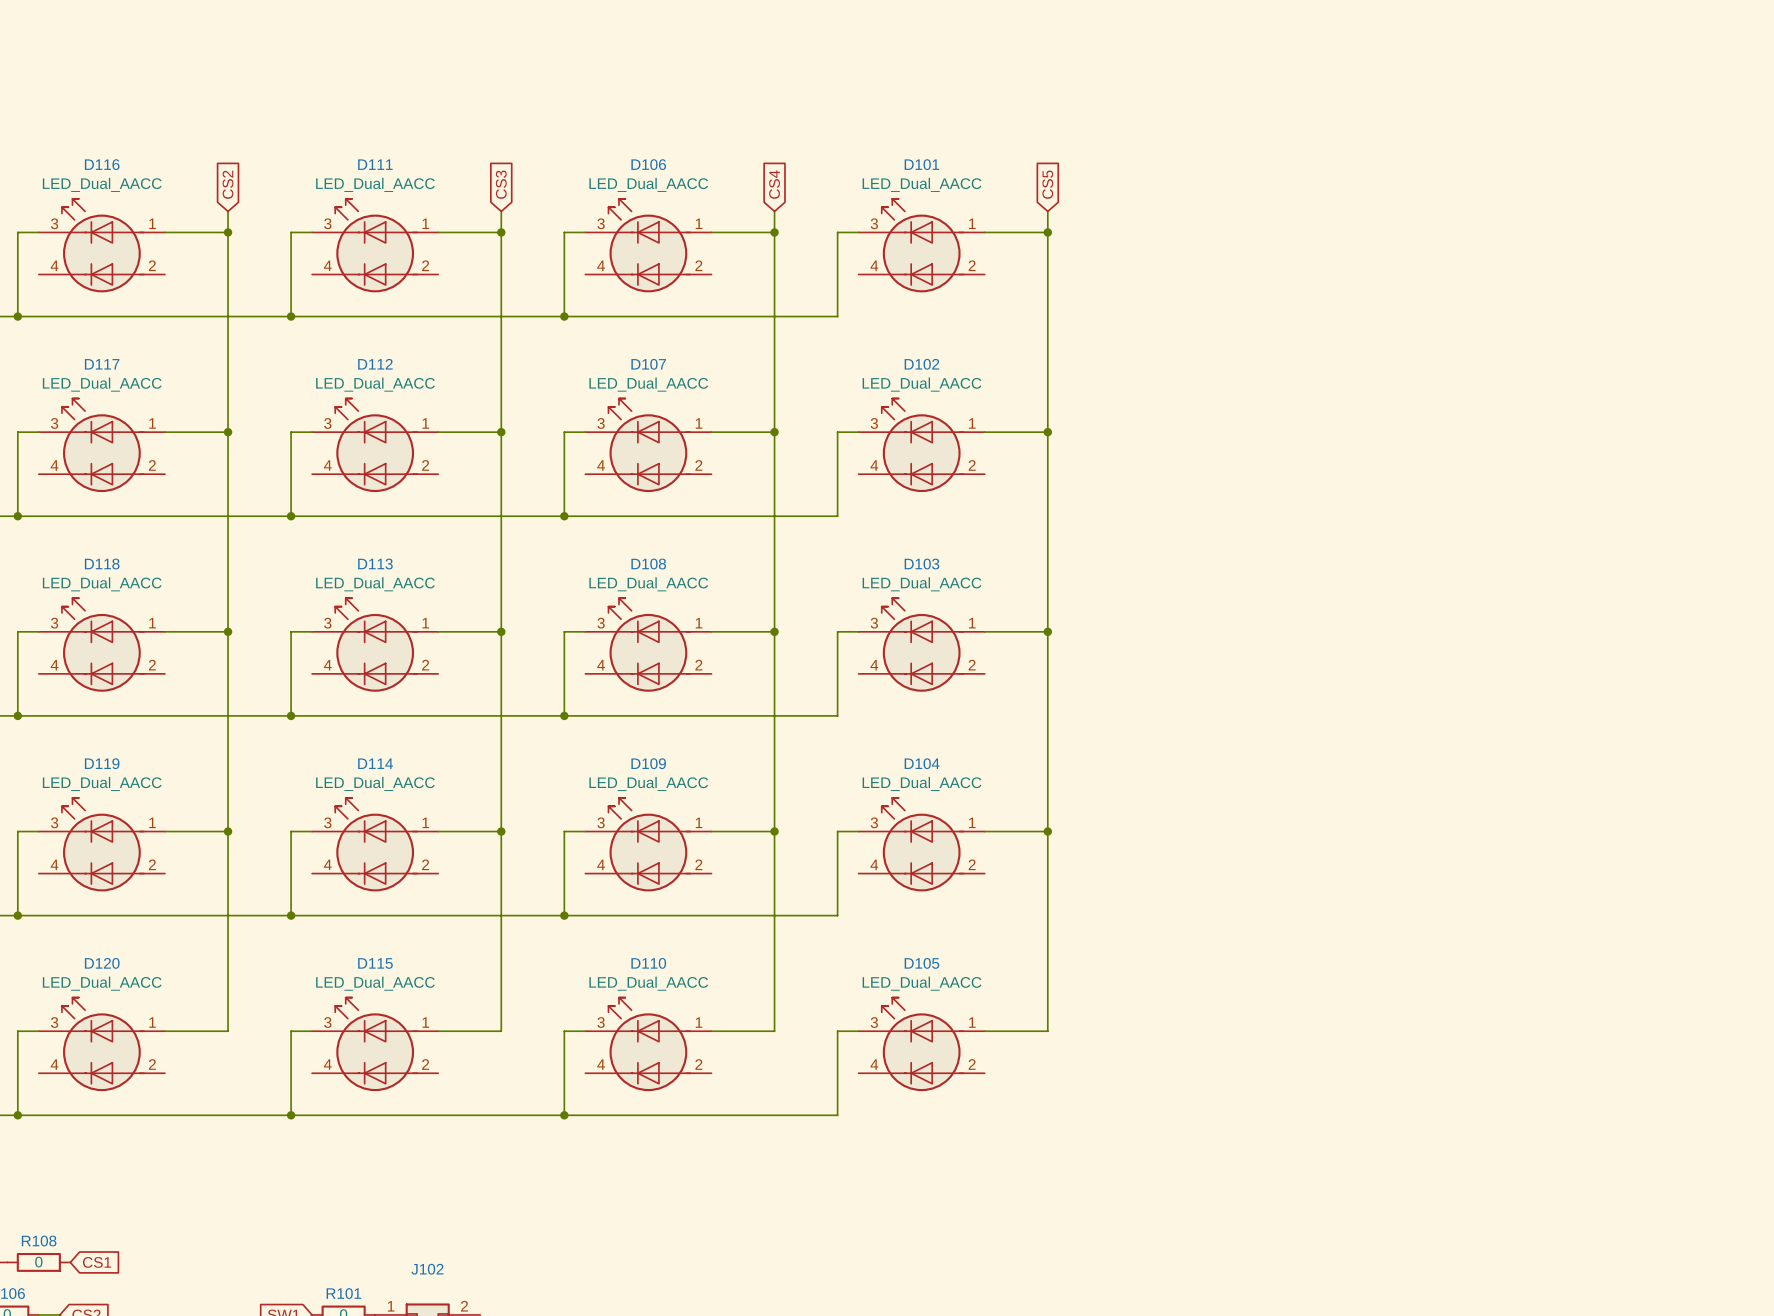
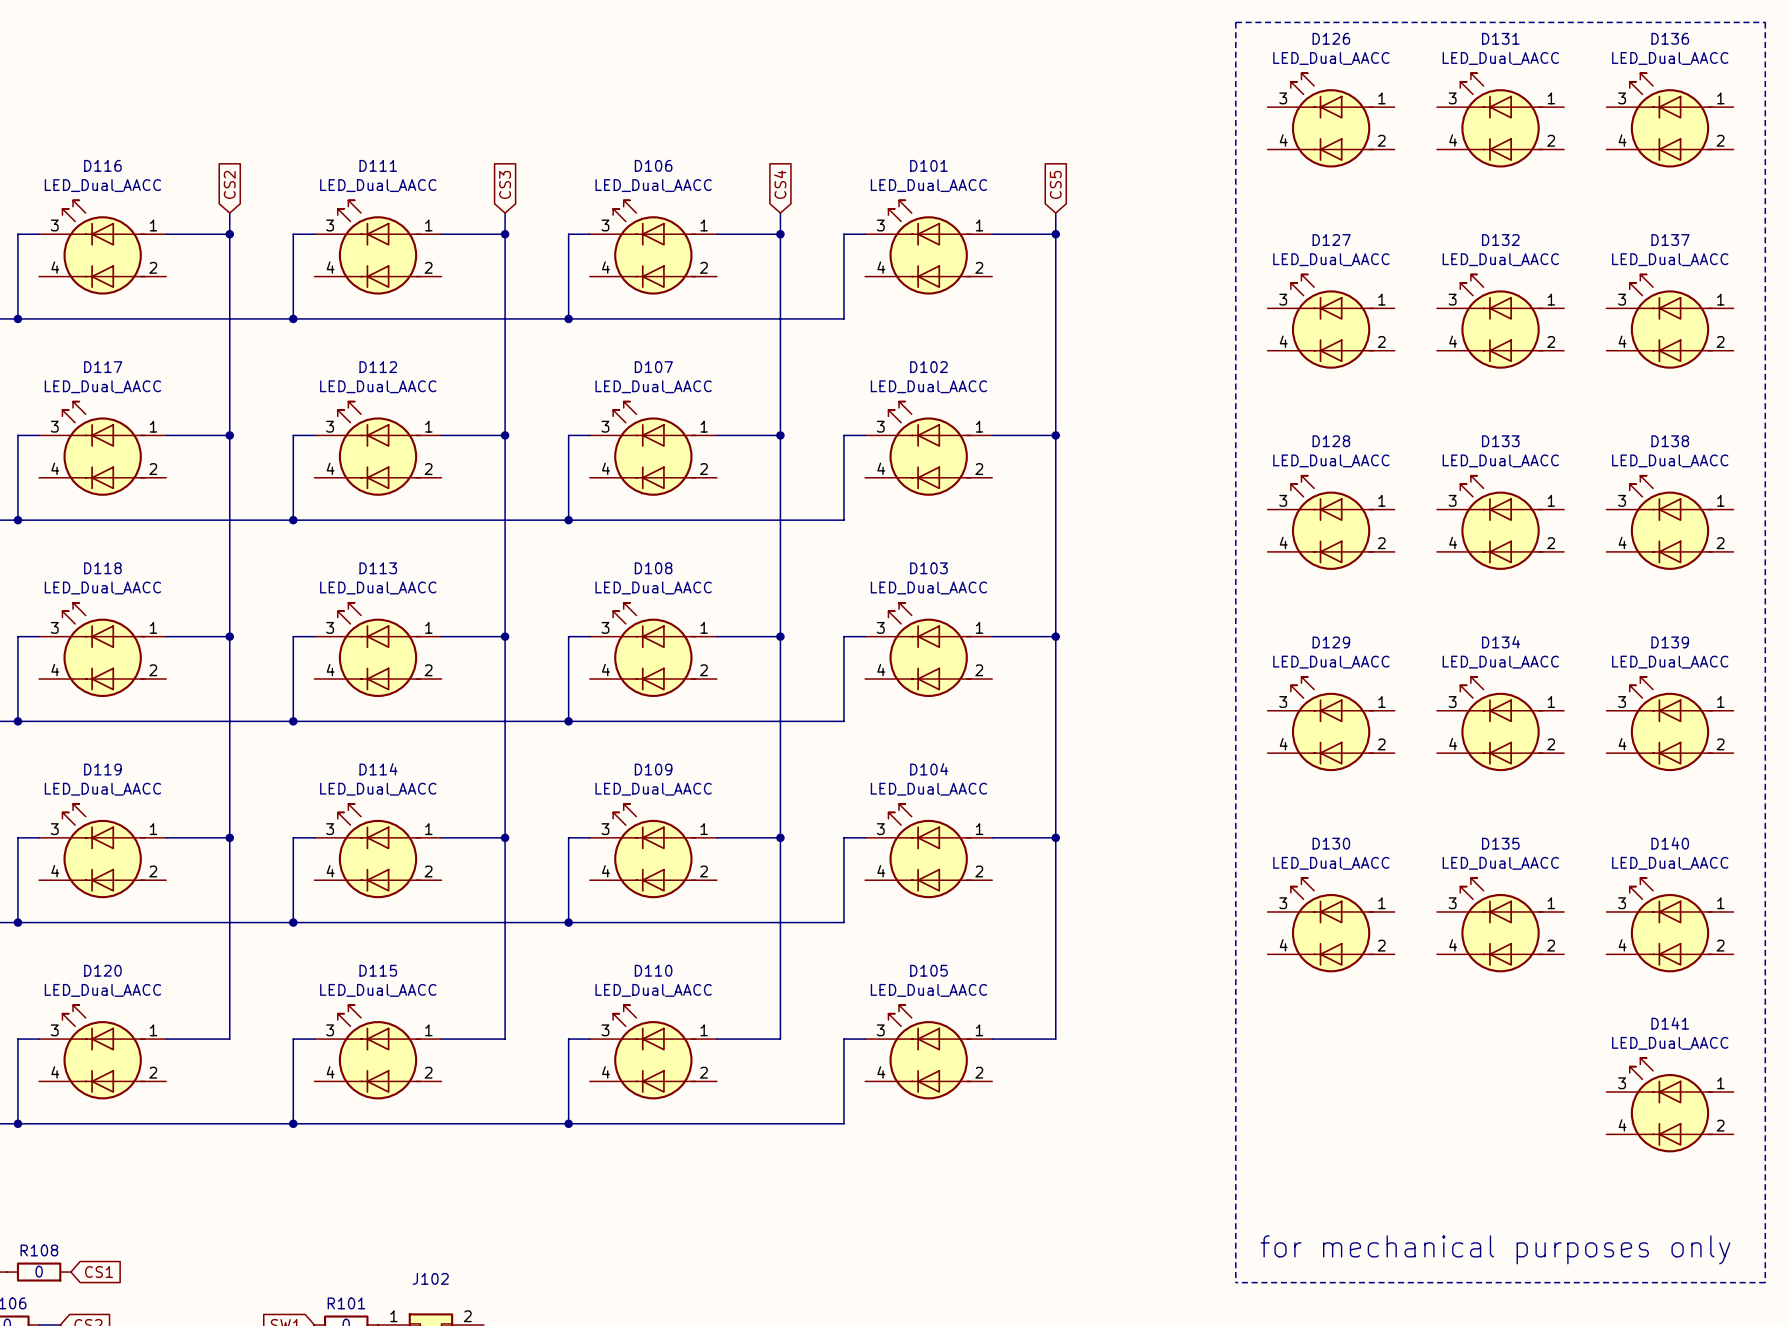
line: none -> (1235, 22) (1235, 1282) (1765, 1282) (1765, 22) (1235, 22)
D126: none -> LED_Dual_AACC (1331, 120)
D131: none -> LED_Dual_AACC (1500, 120)
D136: none -> LED_Dual_AACC (1669, 120)
D127: none -> LED_Dual_AACC (1331, 321)
D132: none -> LED_Dual_AACC (1500, 321)
D137: none -> LED_Dual_AACC (1669, 321)
D128: none -> LED_Dual_AACC (1331, 522)
D133: none -> LED_Dual_AACC (1500, 522)
D138: none -> LED_Dual_AACC (1669, 522)
D129: none -> LED_Dual_AACC (1331, 724)
D134: none -> LED_Dual_AACC (1500, 724)
D139: none -> LED_Dual_AACC (1669, 724)
D130: none -> LED_Dual_AACC (1331, 925)
D135: none -> LED_Dual_AACC (1500, 925)
D140: none -> LED_Dual_AACC (1669, 925)
D141: none -> LED_Dual_AACC (1669, 1105)
text: none -> for mechanical purposes only (1495, 1249)

